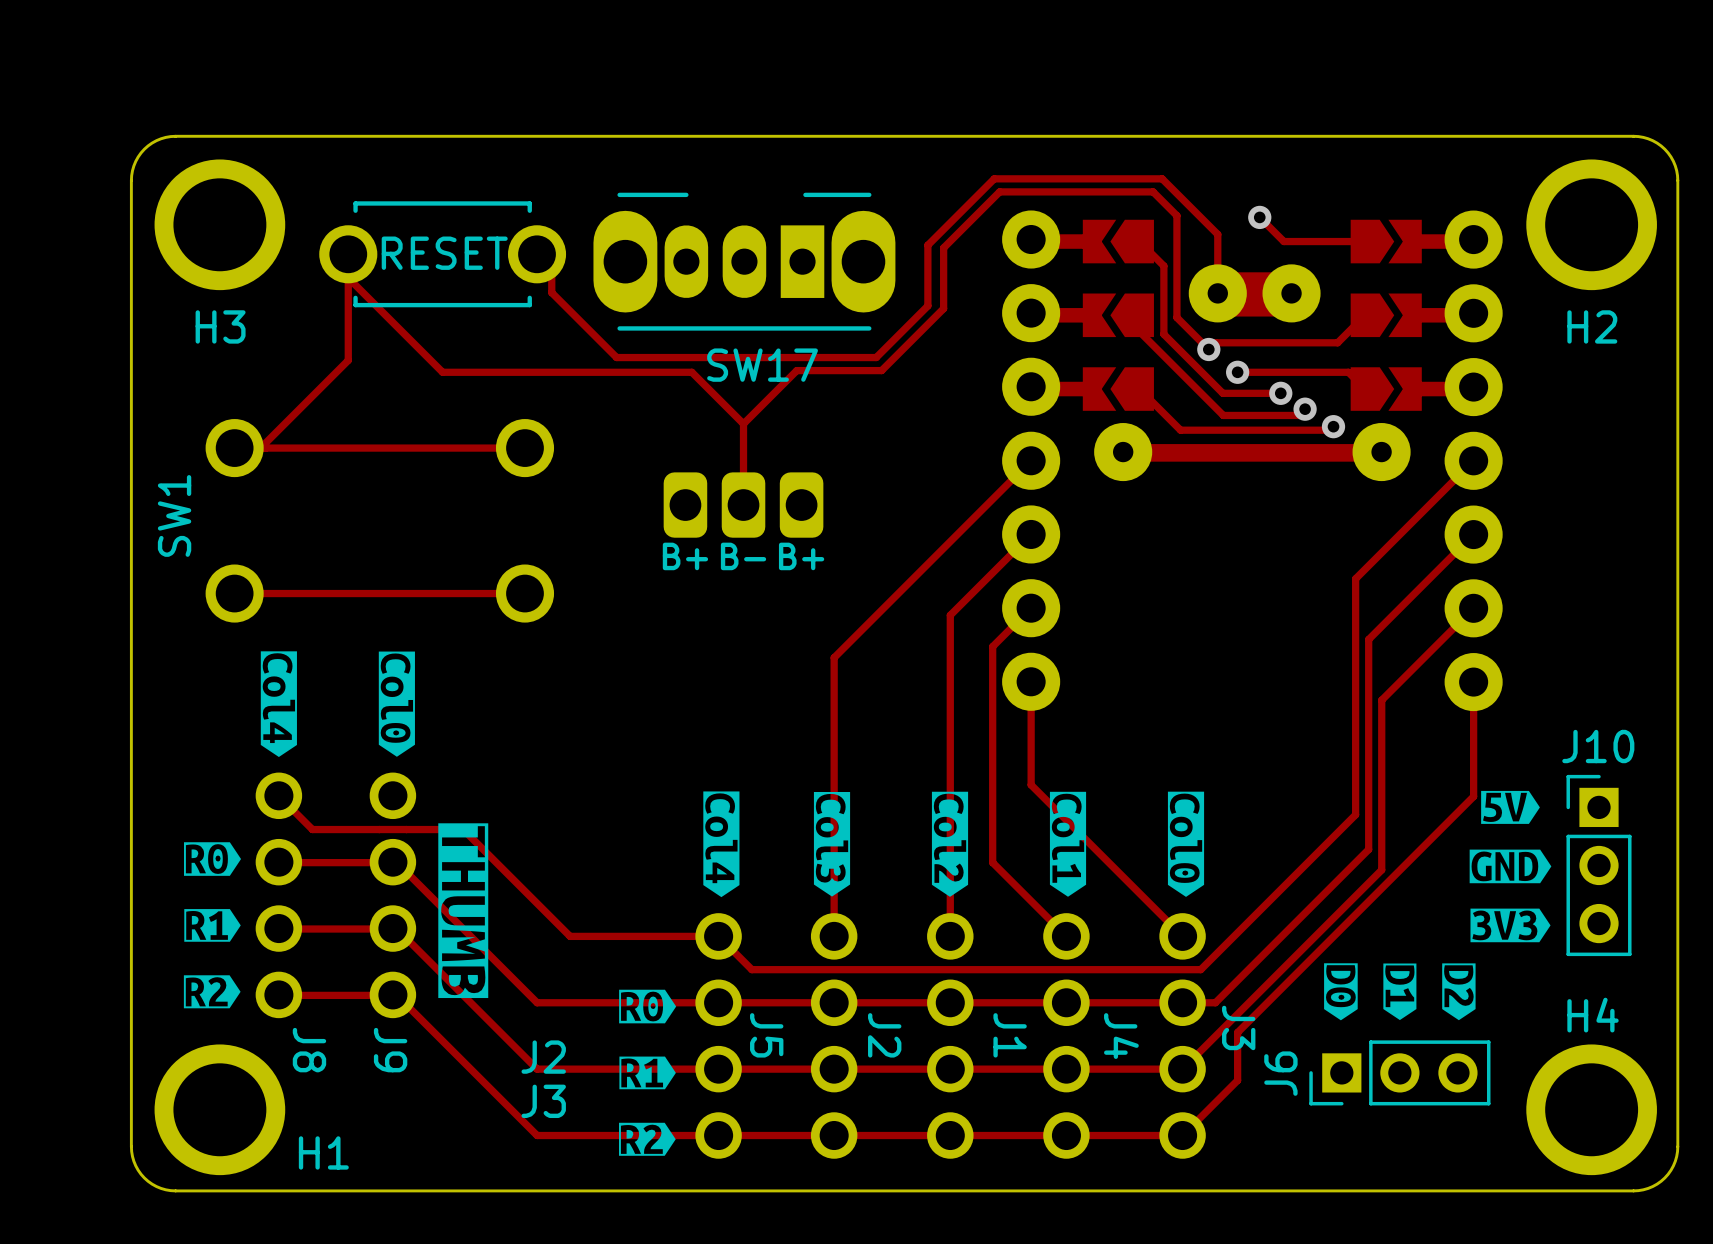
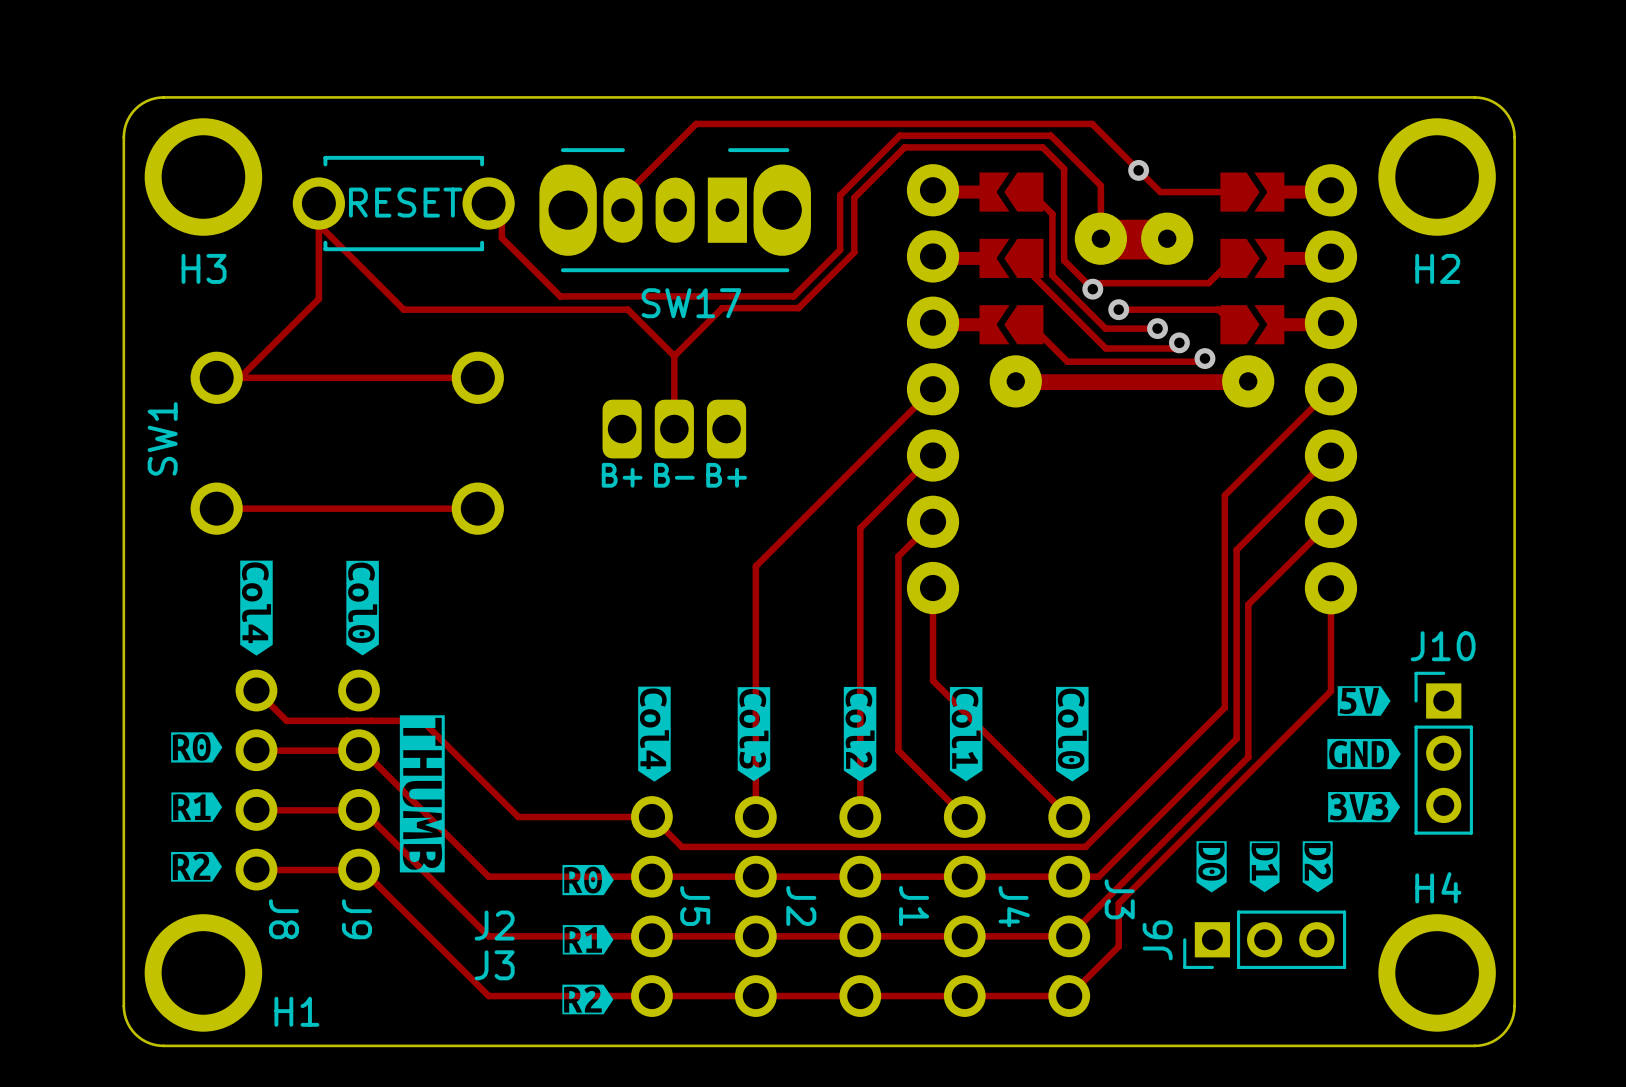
track: none -> (1138, 170) (1092, 123) (696, 123) (622, 197) (622, 210)

